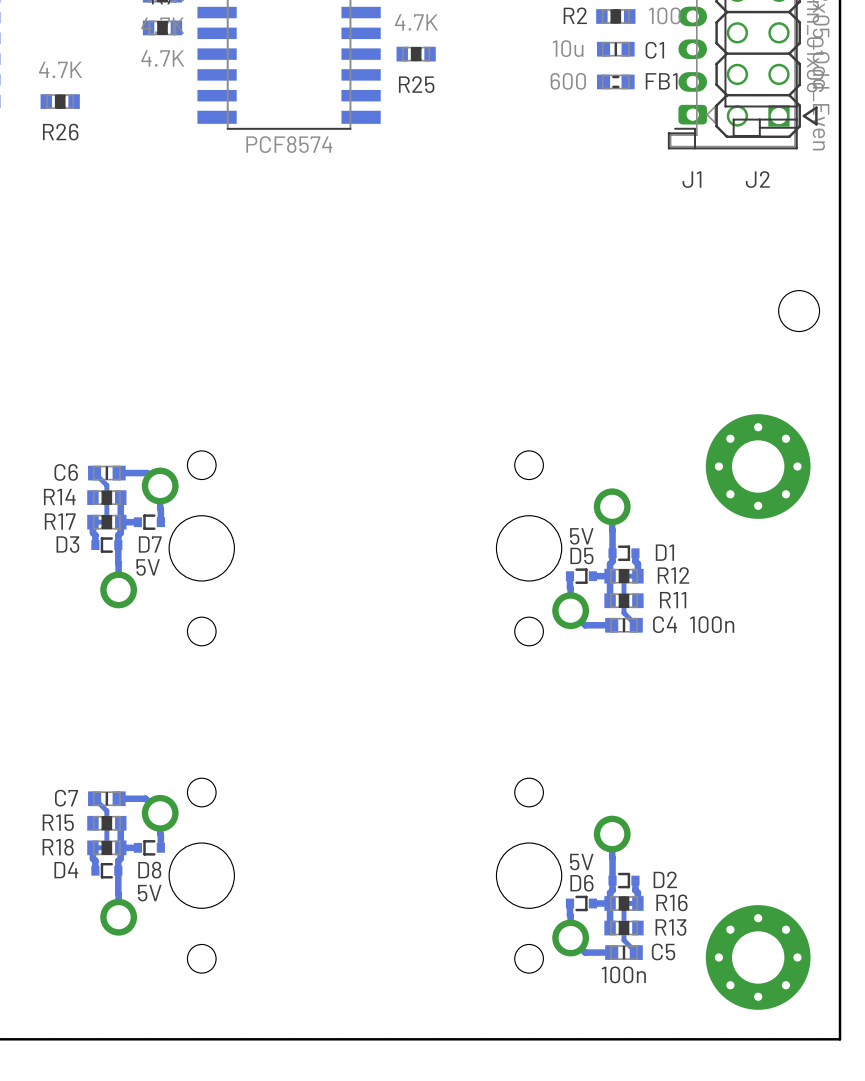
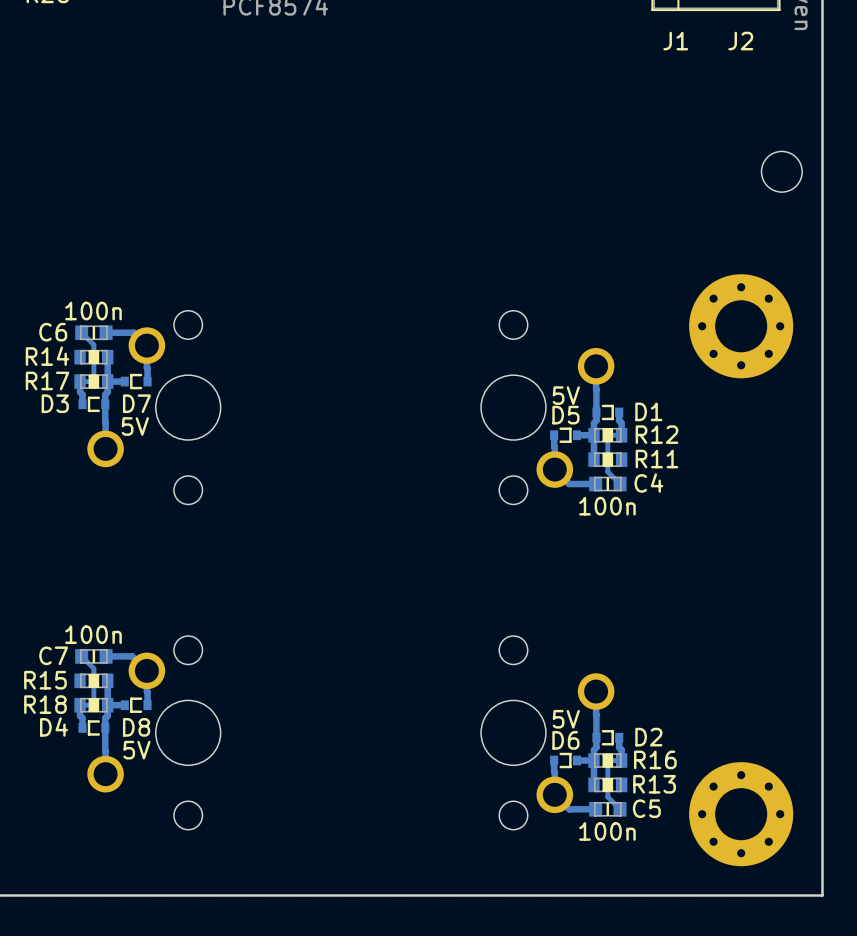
C6 value: none -> 100n (93, 311)
C4 value position: 100n (712, 624) -> 100n (607, 506)
C7 value: none -> 100n (93, 634)

